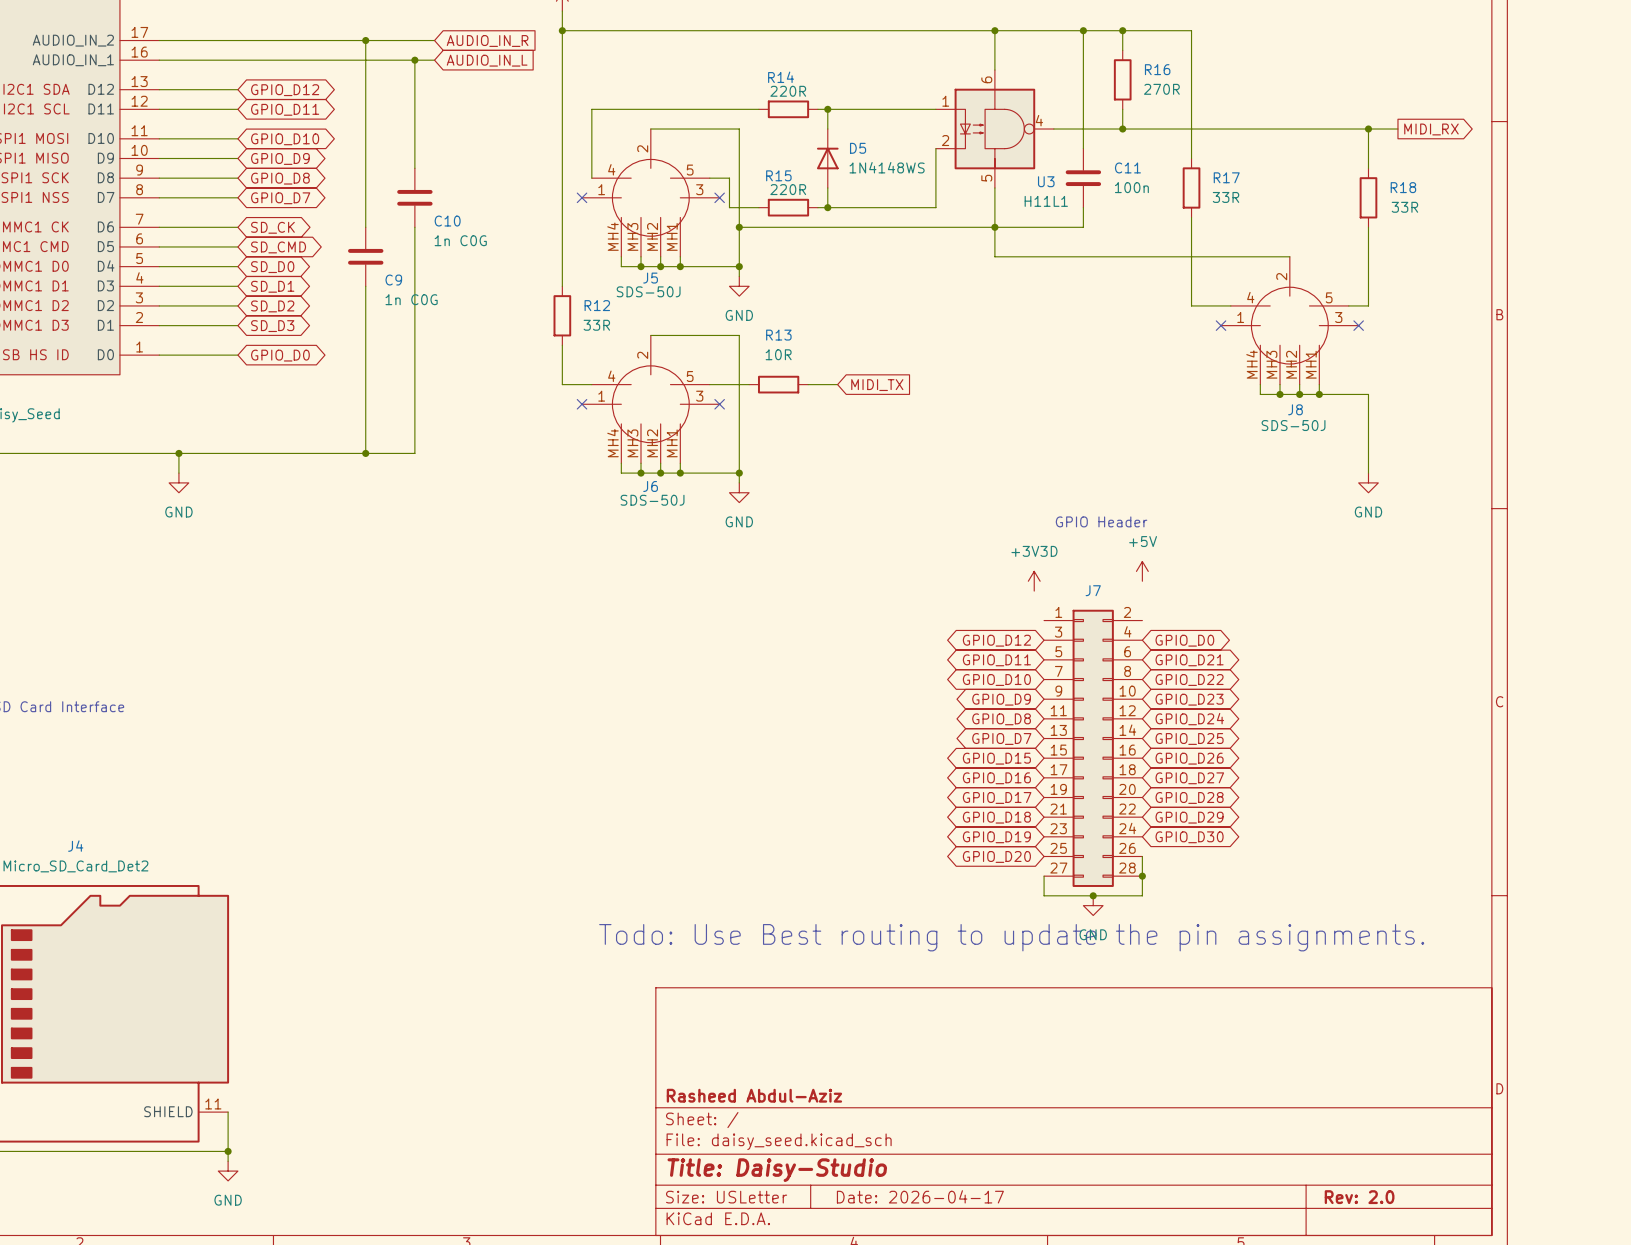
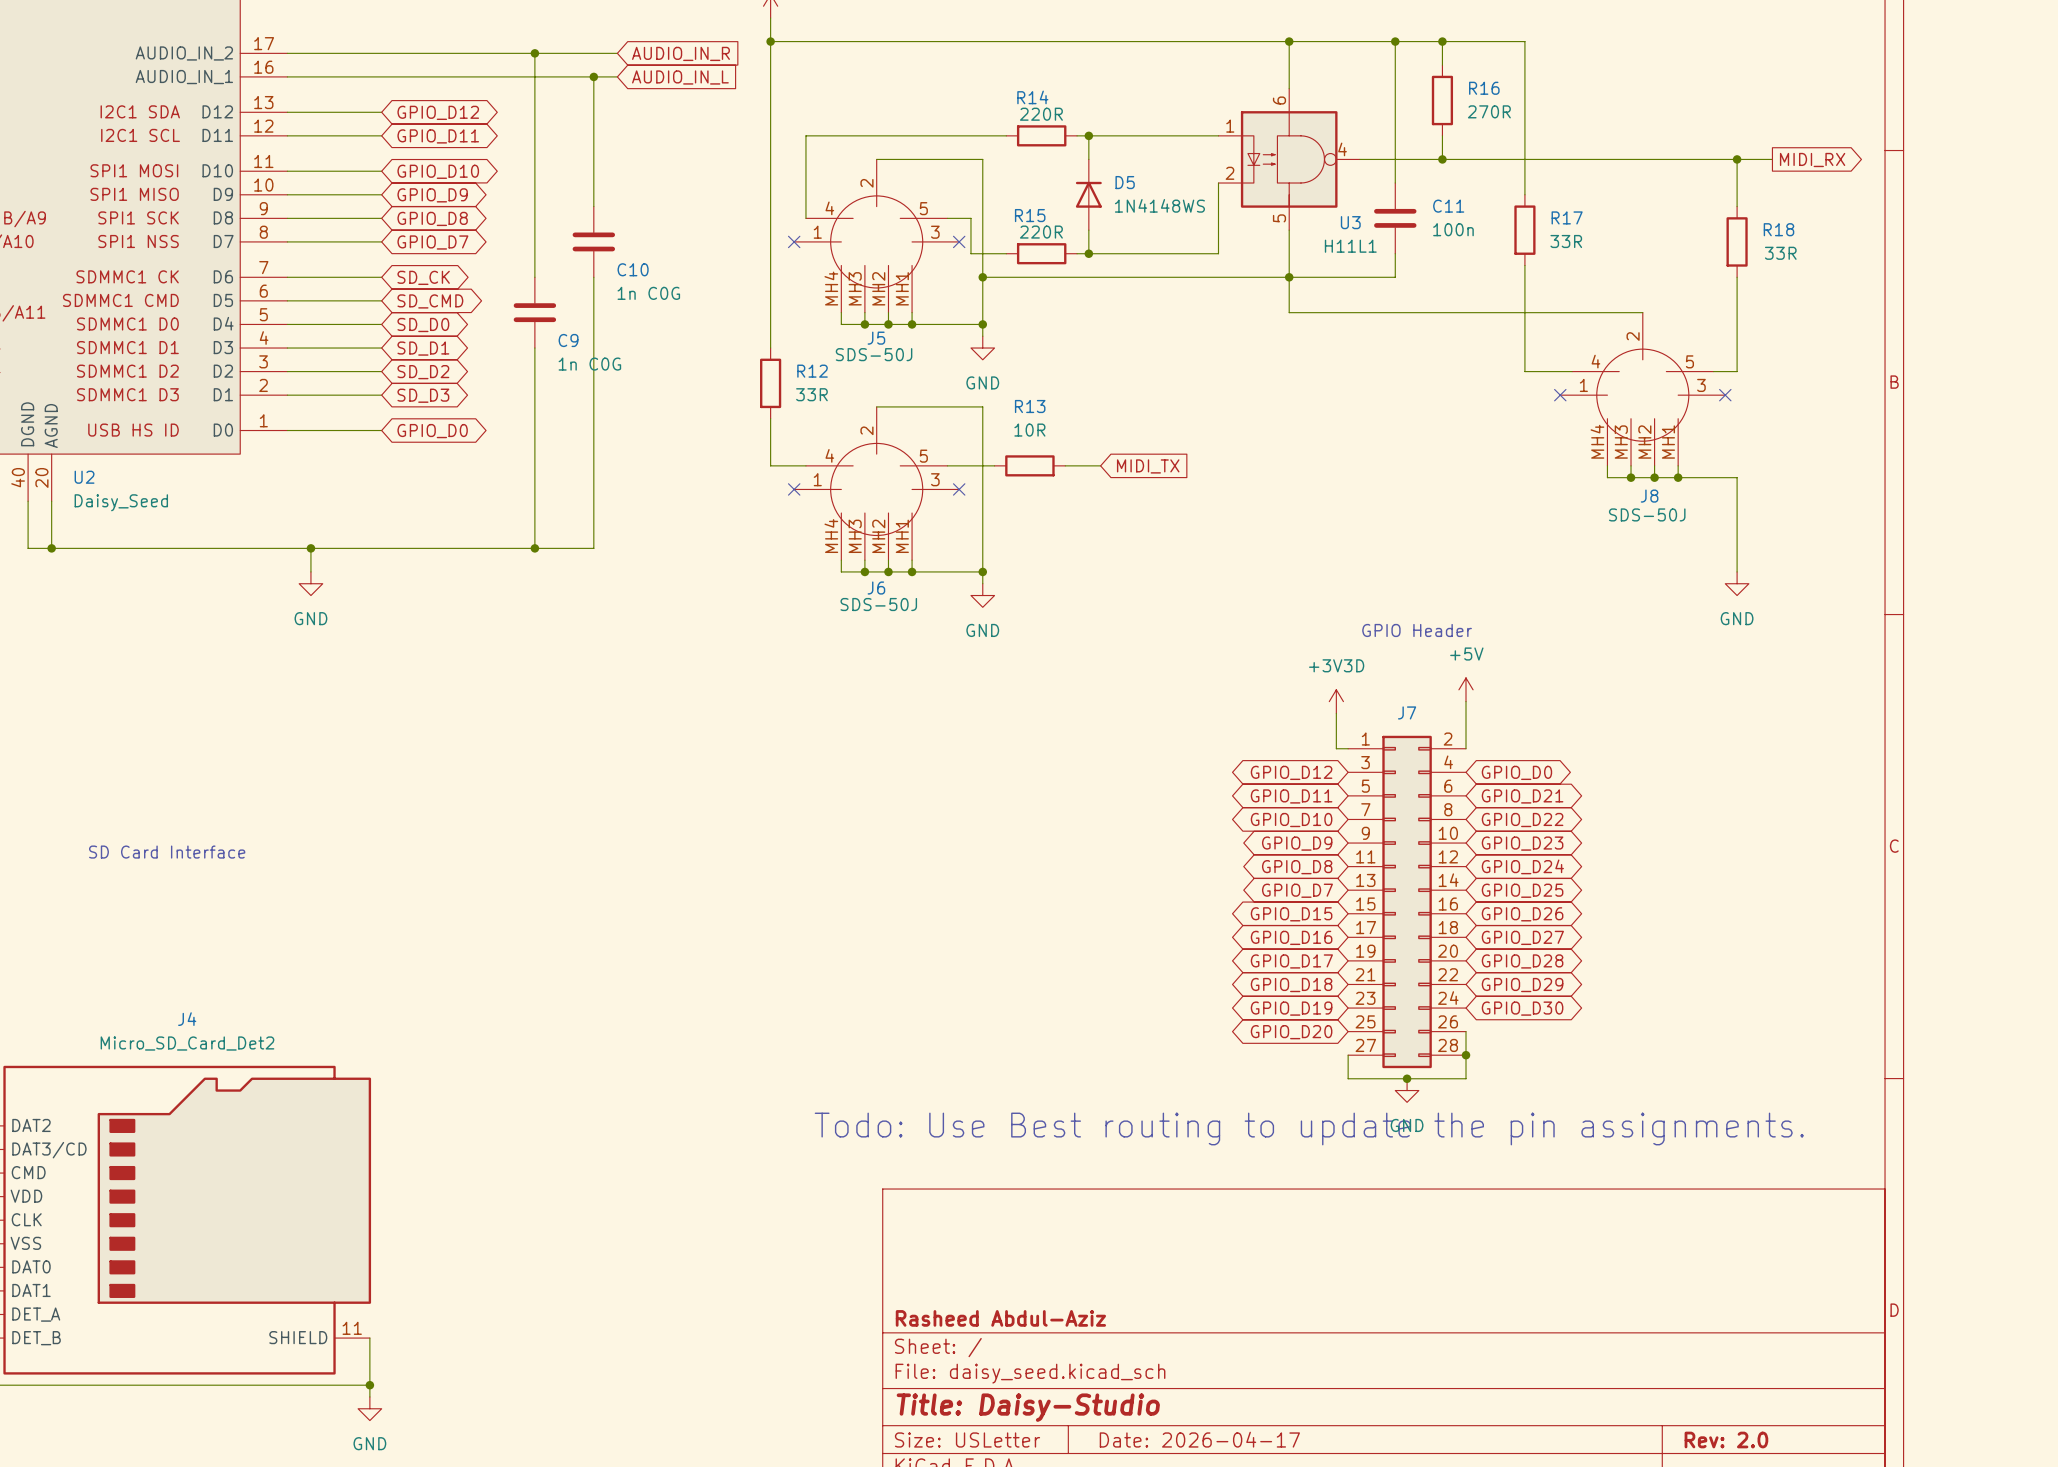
wire: none -> (1466, 701) (1466, 748)
wire: none -> (1336, 713) (1336, 748) (1348, 748)

